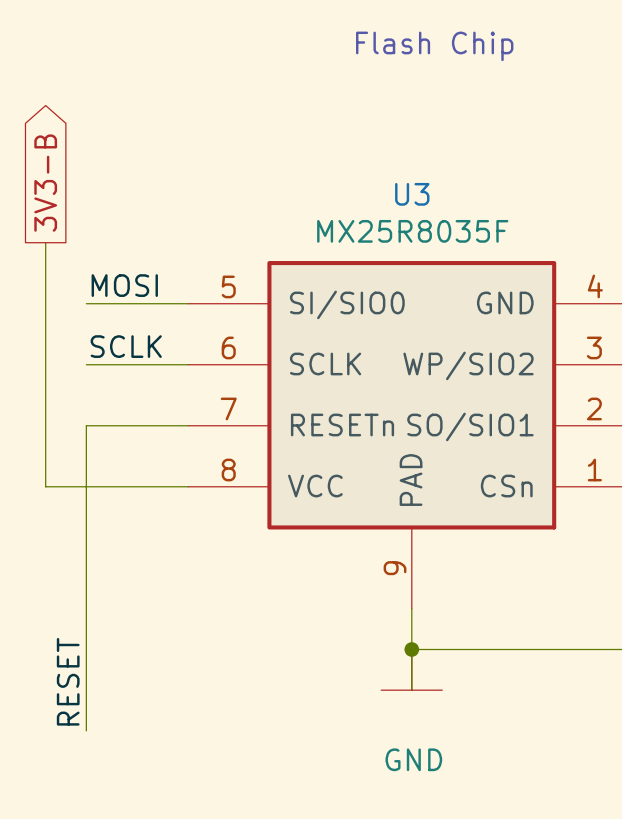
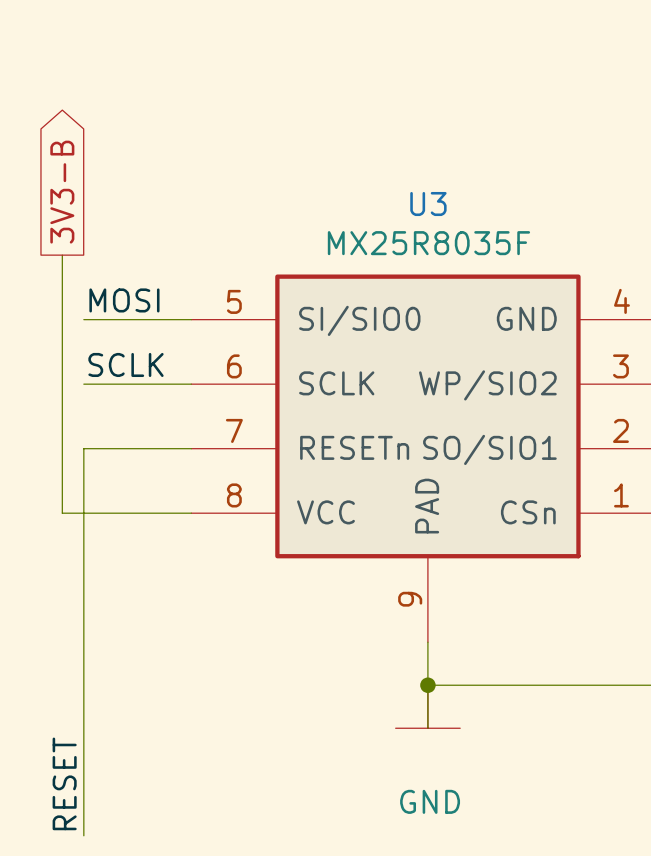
text: Flash Chip (434, 46) -> none
global label position: 3V3-B (45, 183) -> 3V3-B (62, 192)
wire: (45, 242) (45, 486) (66, 486) -> (62, 255) (62, 513)
label position: RESET (68, 681) -> RESET (64, 783)
wire: none -> (83, 771) (83, 835)

